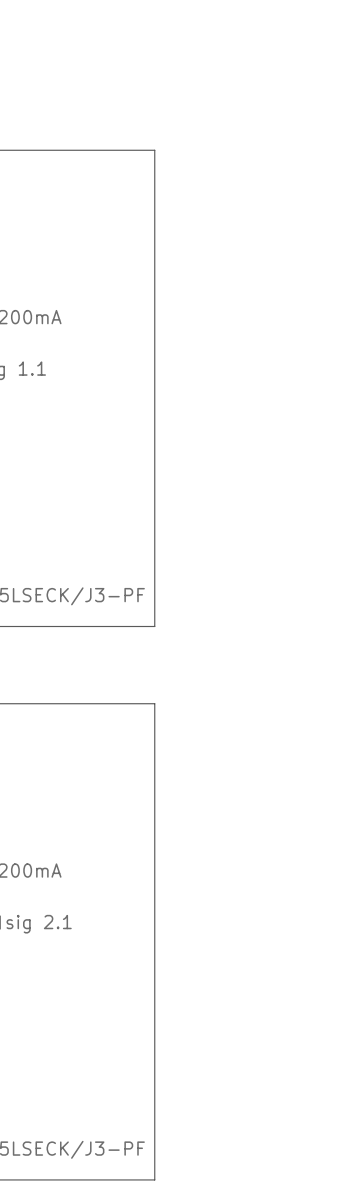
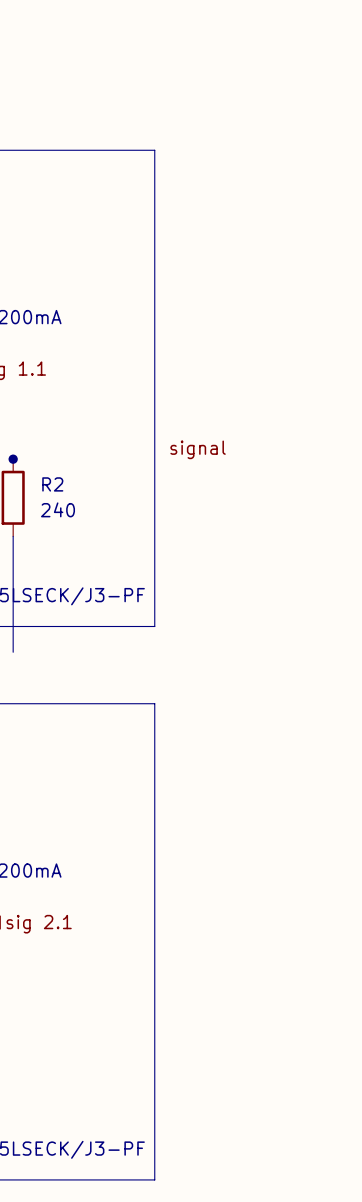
label: none -> signal (198, 449)
junction: none -> (13, 459)
R2: none -> 240 (13, 497)
wire: none -> (13, 536) (13, 652)

